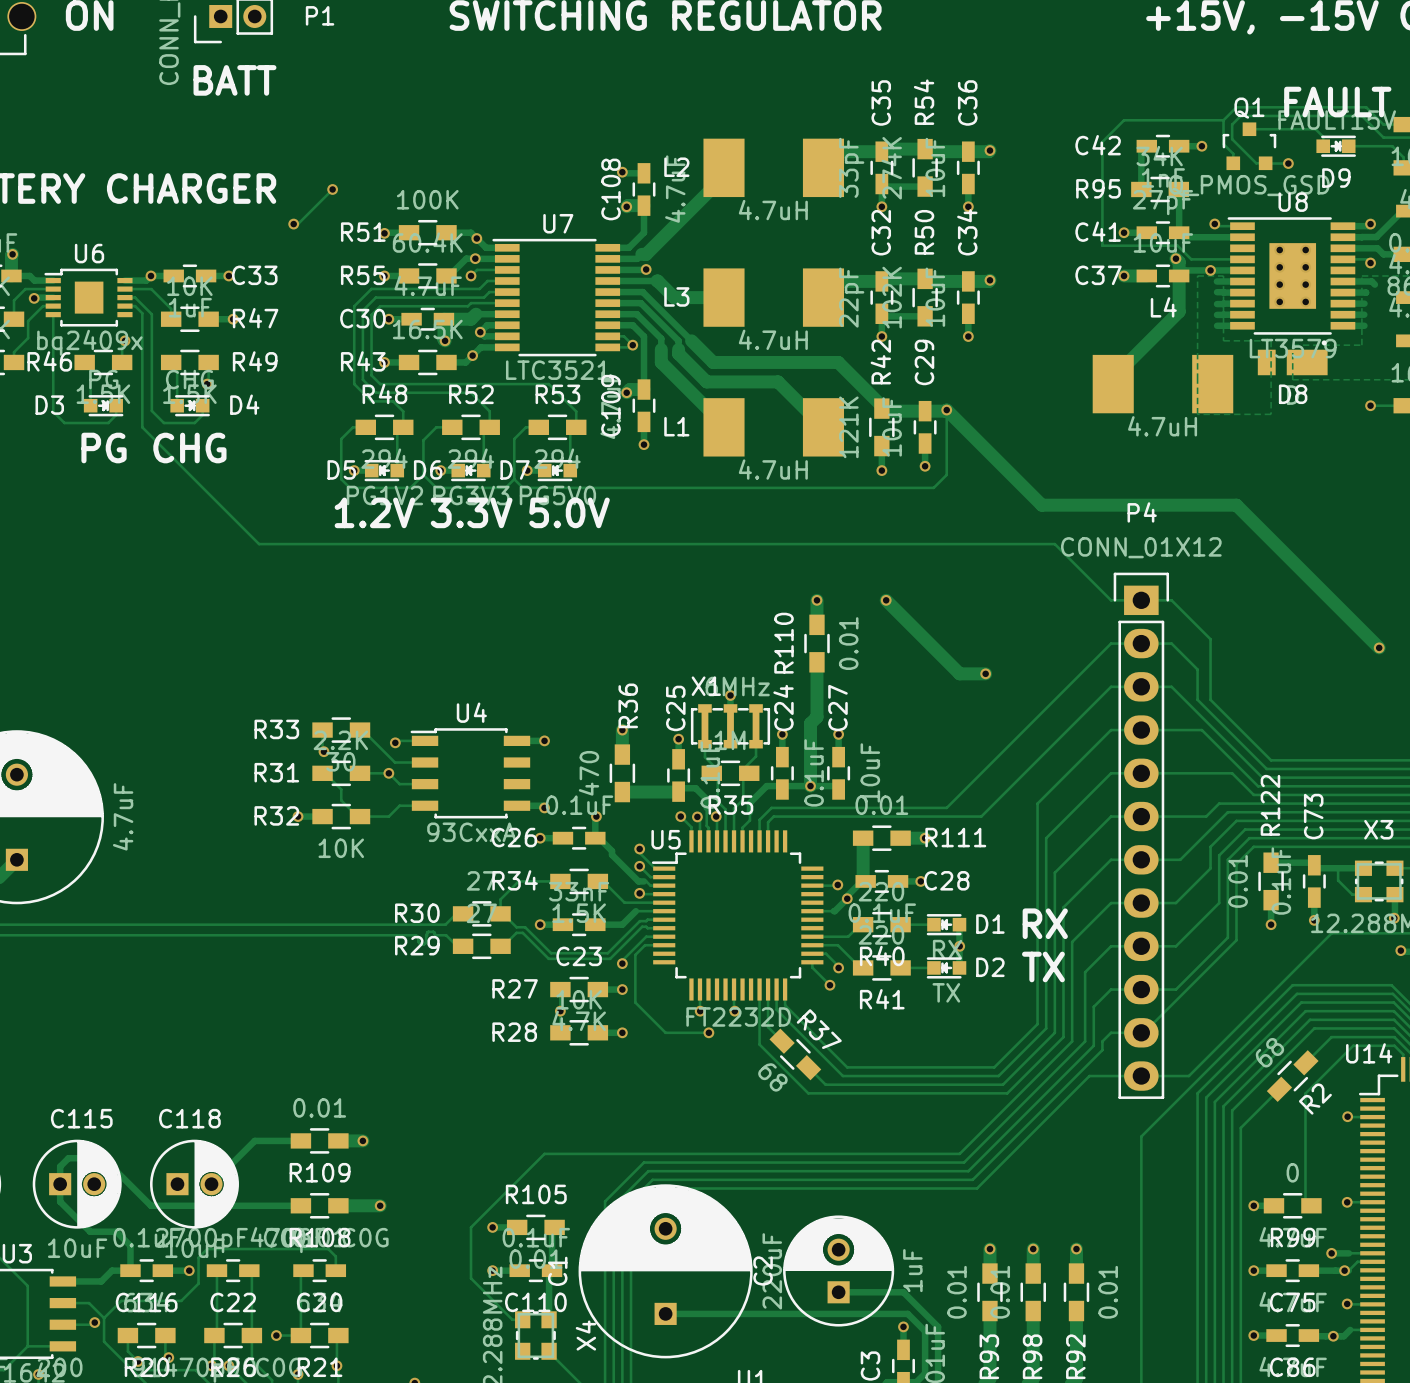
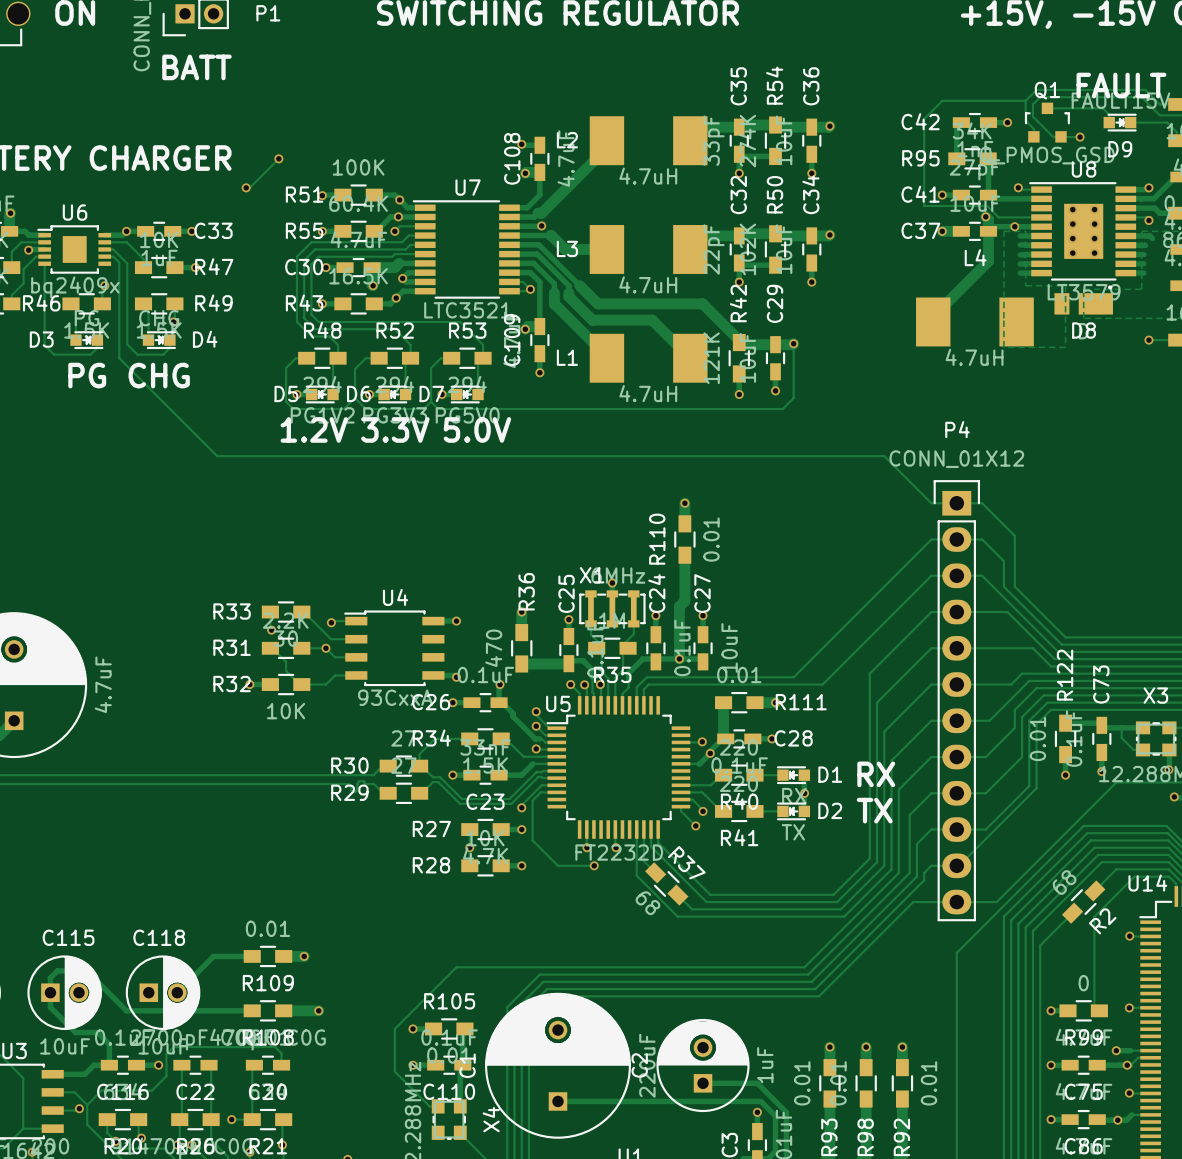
track: (946, 410) (1041, 505) (1236, 505) (1379, 647) -> none
track: (886, 600) (959, 673) (985, 673) -> none
via: (886, 600) -> none
via: (1379, 647) -> none
via: (985, 673) -> none

